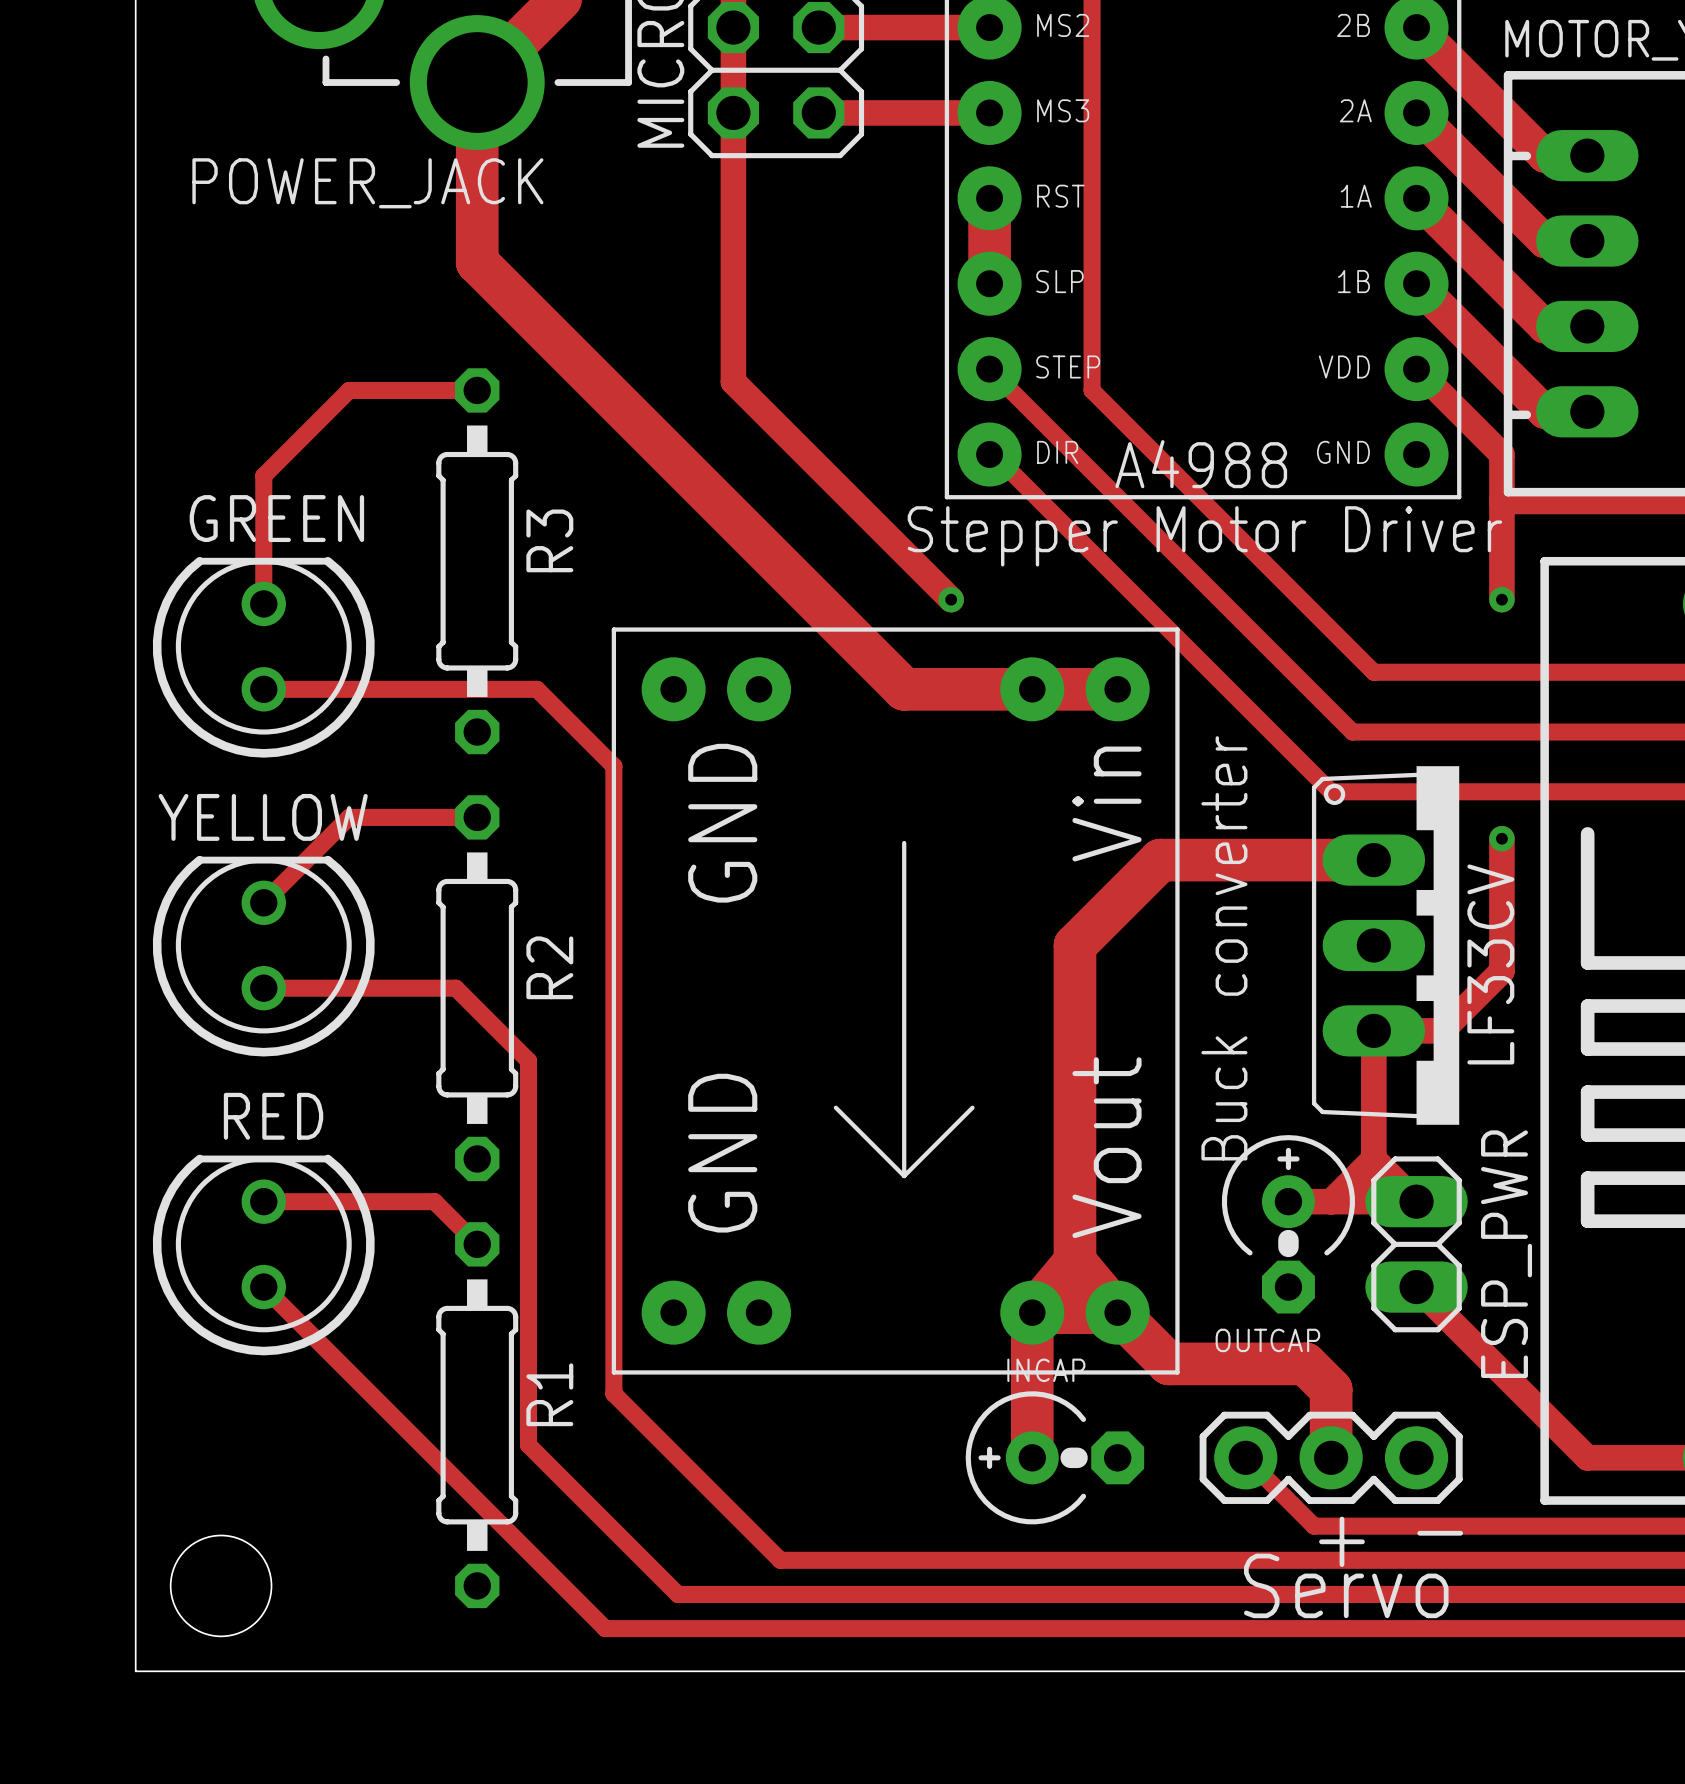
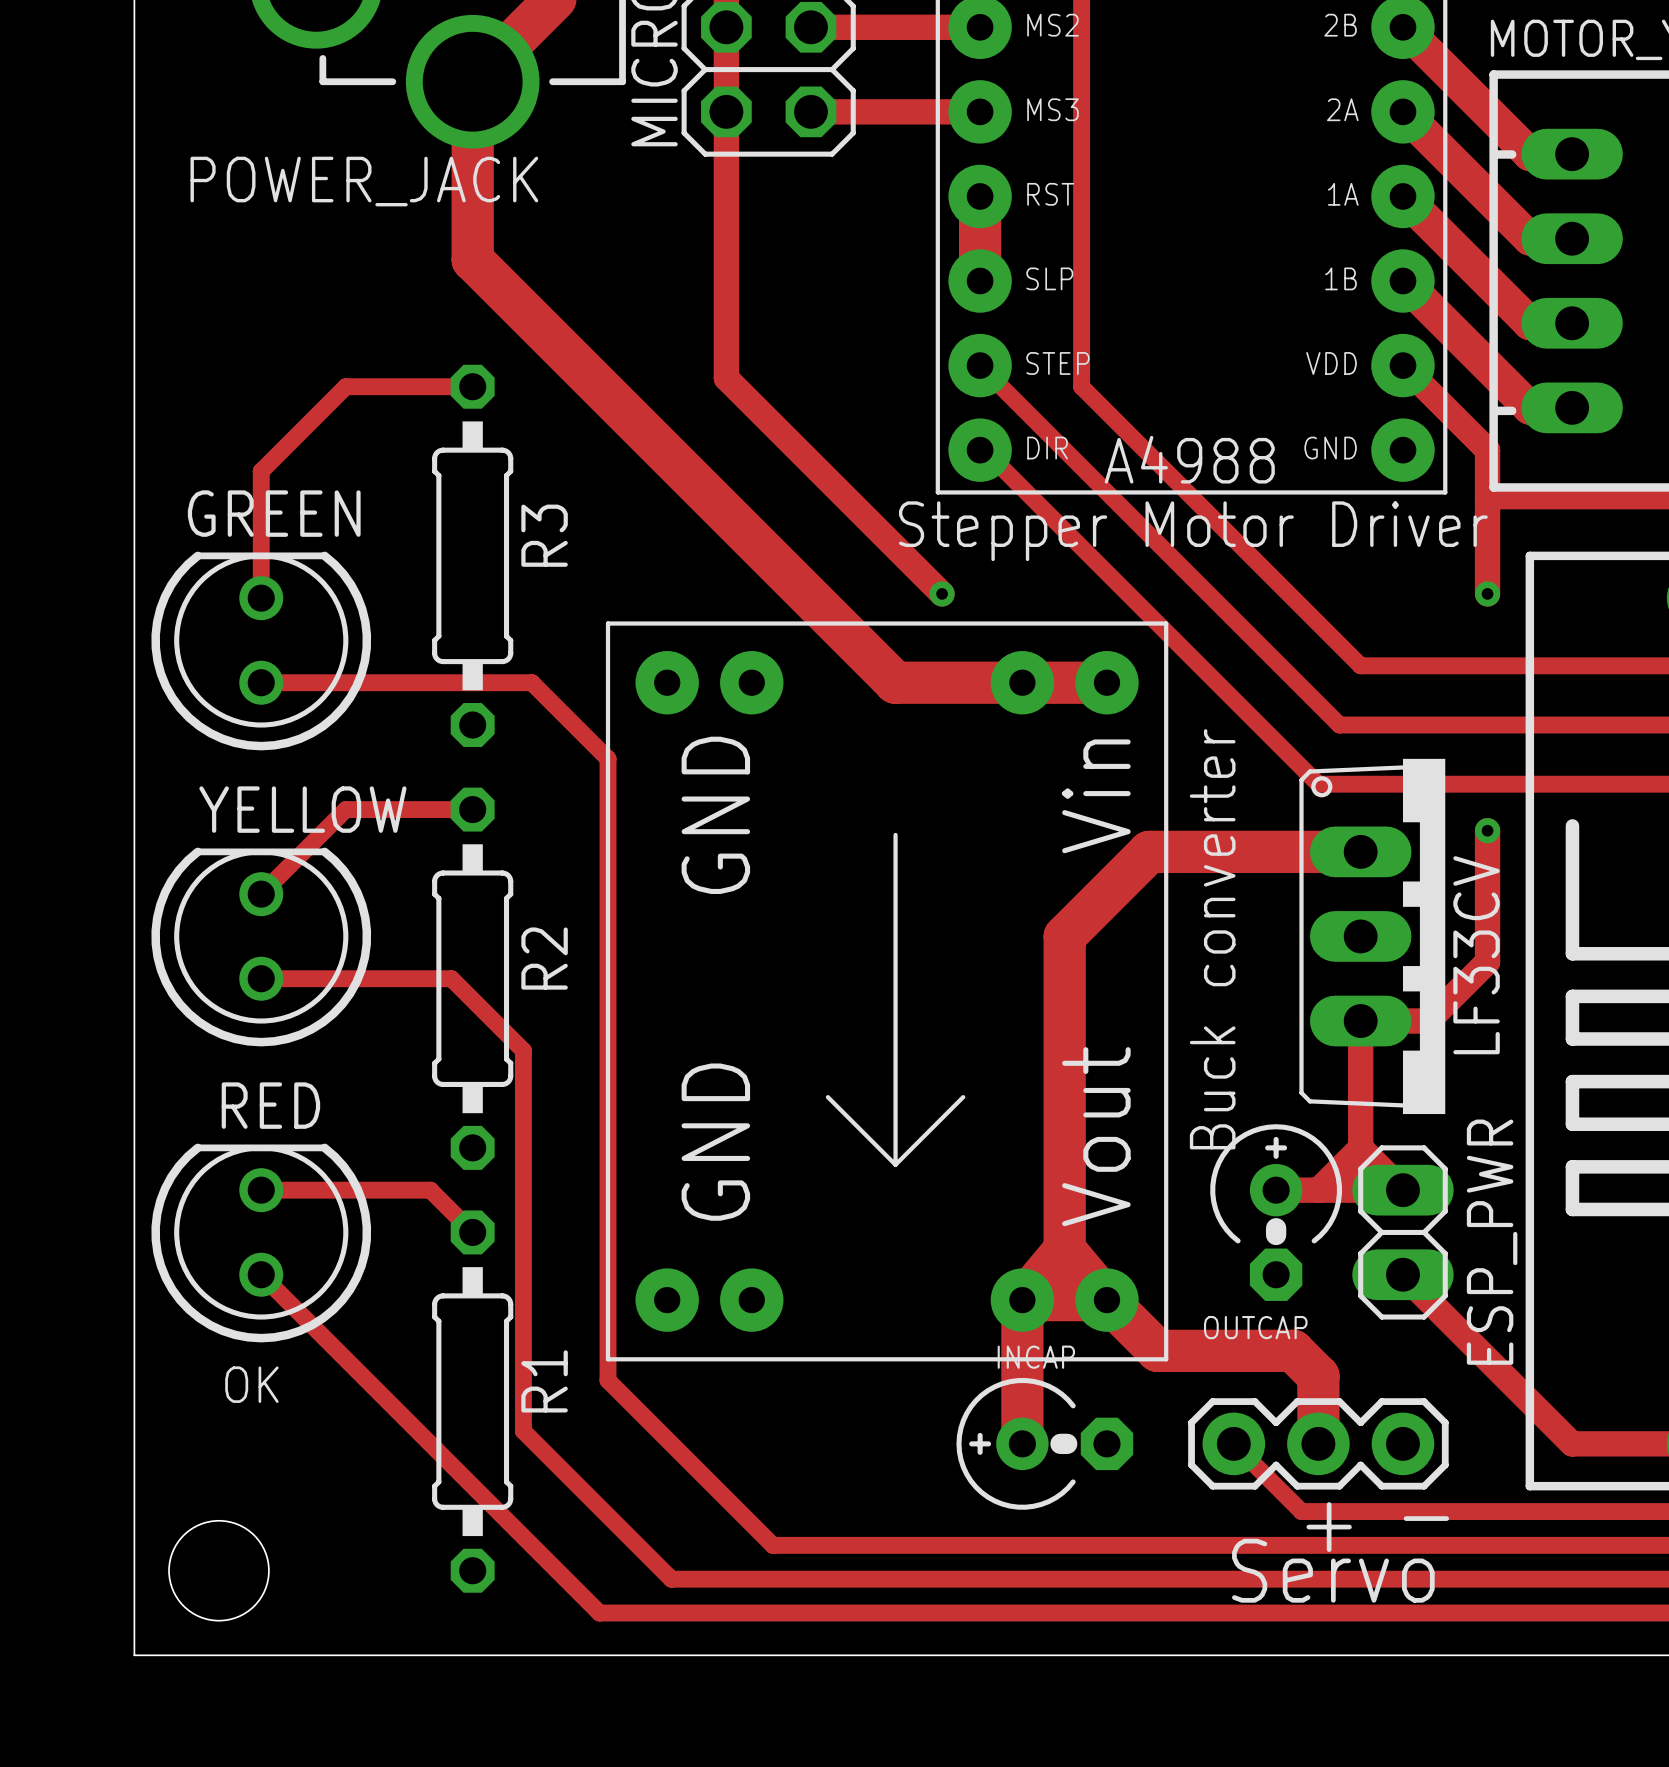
YELLOW name position: YELLOW (263, 817) -> YELLOW (302, 809)
text: none -> OK (251, 1384)

